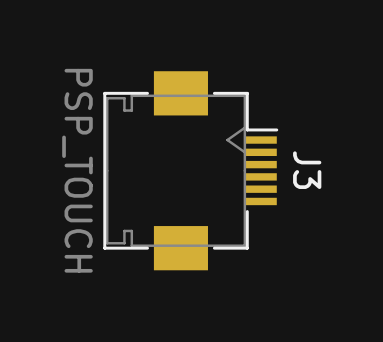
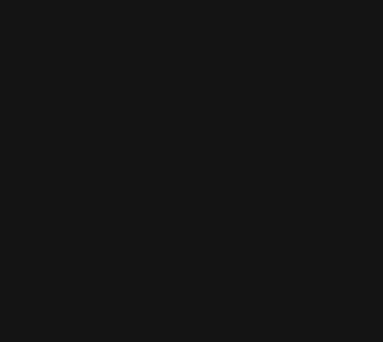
J3: PSP_TOUCH (190, 170) -> none

